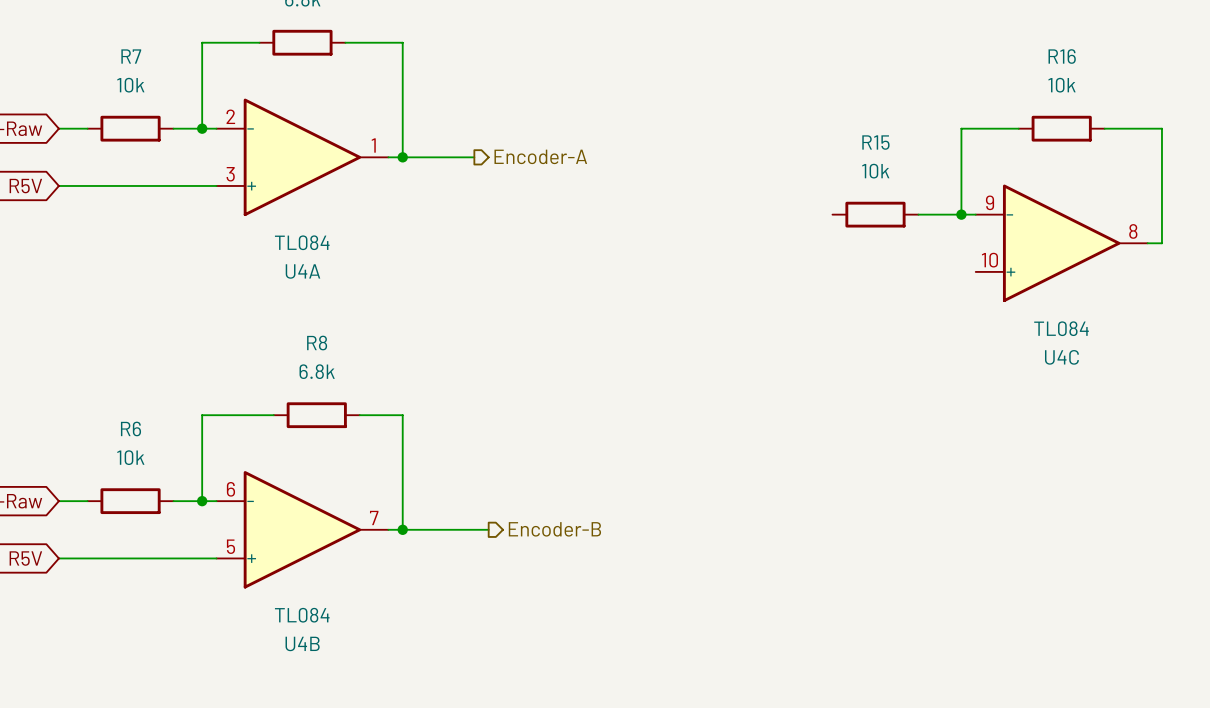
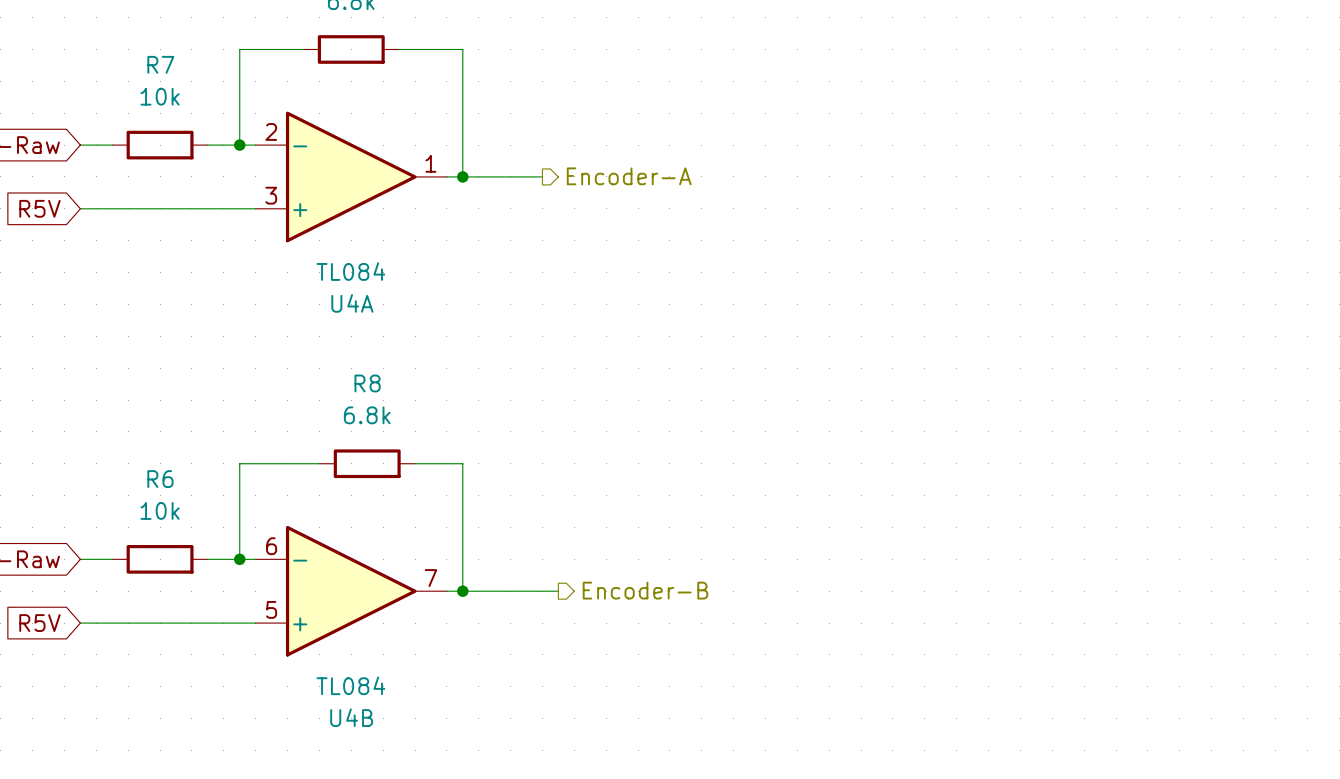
wire: (1018, 128) (961, 128) (961, 214) -> none
R16: 10k (1061, 128) -> none
wire: (1104, 128) (1161, 128) (1161, 243) (1147, 243) -> none
R15: 10k (875, 214) -> none
wire: (918, 214) (975, 214) -> none
junction: (961, 214) -> none
U4C: TL084 (1061, 243) -> none

